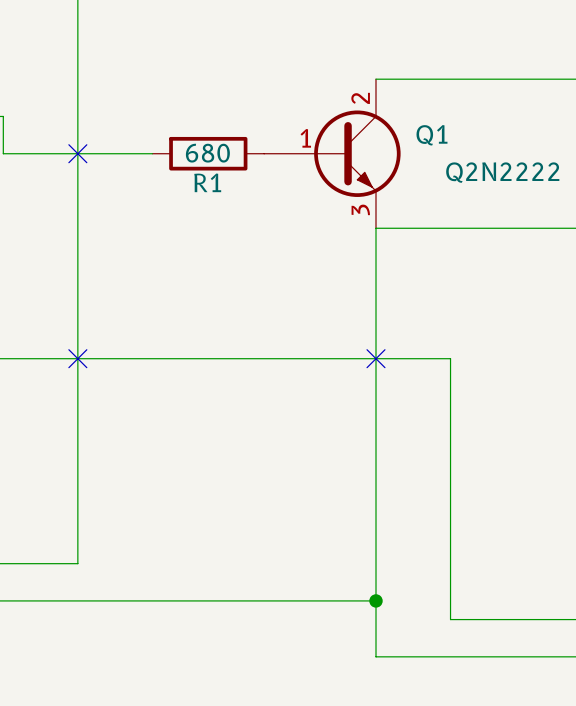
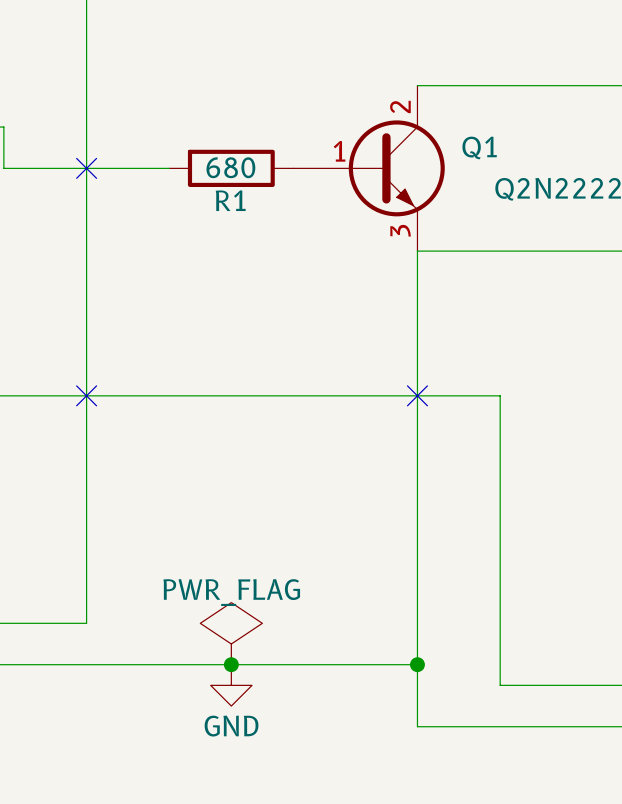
power symbol: none -> PWR_FLAG (231, 633)
junction: none -> (231, 664)
power symbol: none -> GND (231, 685)

